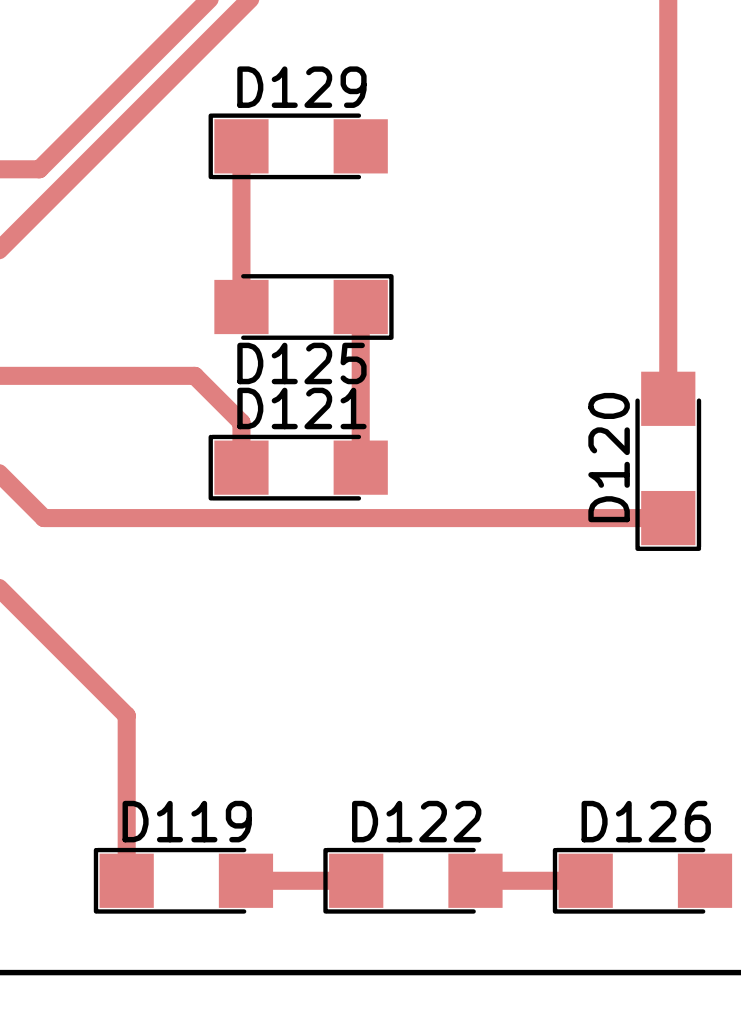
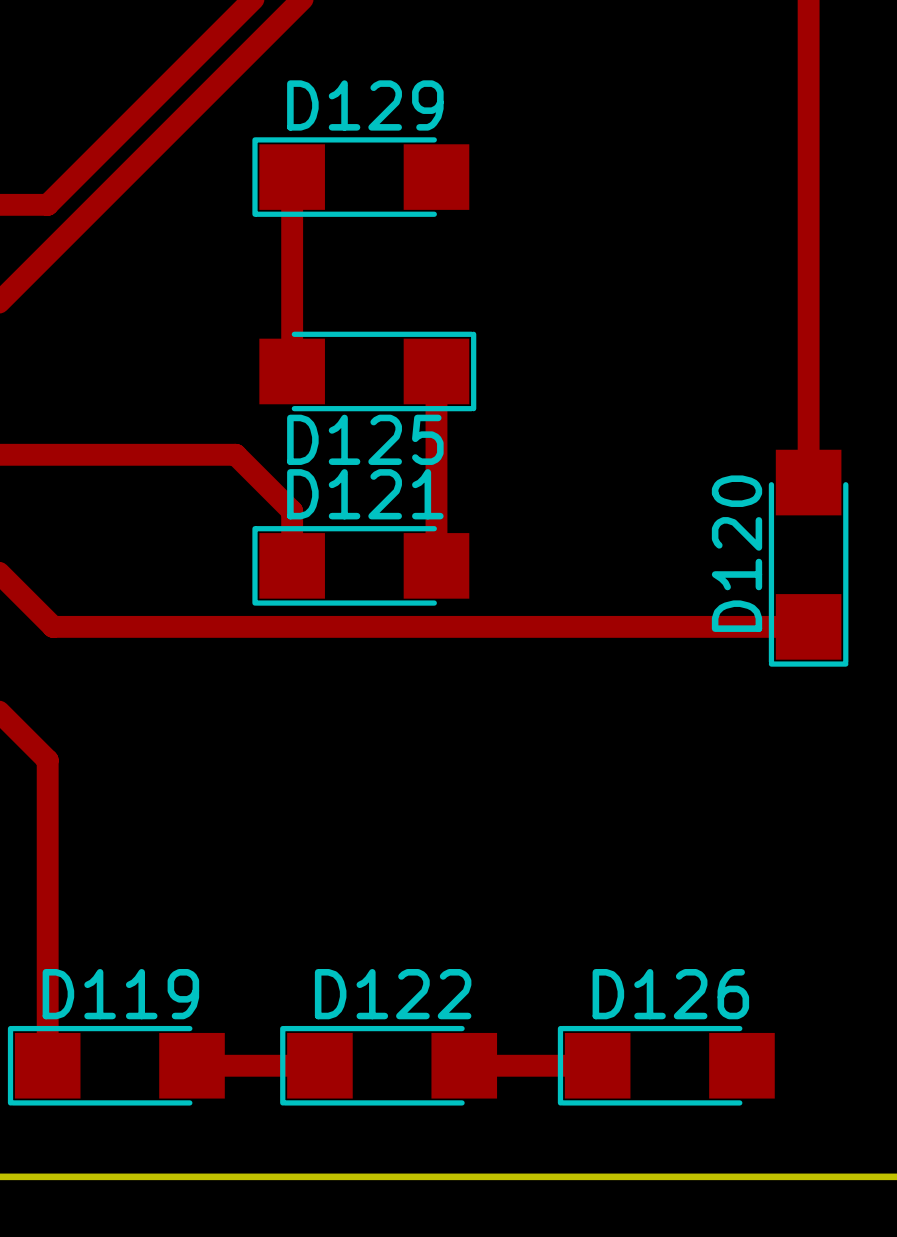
track: (39, 628) (126, 715) (126, 880) -> (47, 760) (47, 1065)
track: none -> (192, 1065) (297, 1065)
D119 position: (183, 880) -> (116, 1065)
track: (264, 880) (356, 880) -> none
D122 position: (412, 880) -> (388, 1065)
track: (493, 880) (585, 880) -> (464, 1065) (575, 1065)
D126 position: (642, 880) -> (666, 1065)

